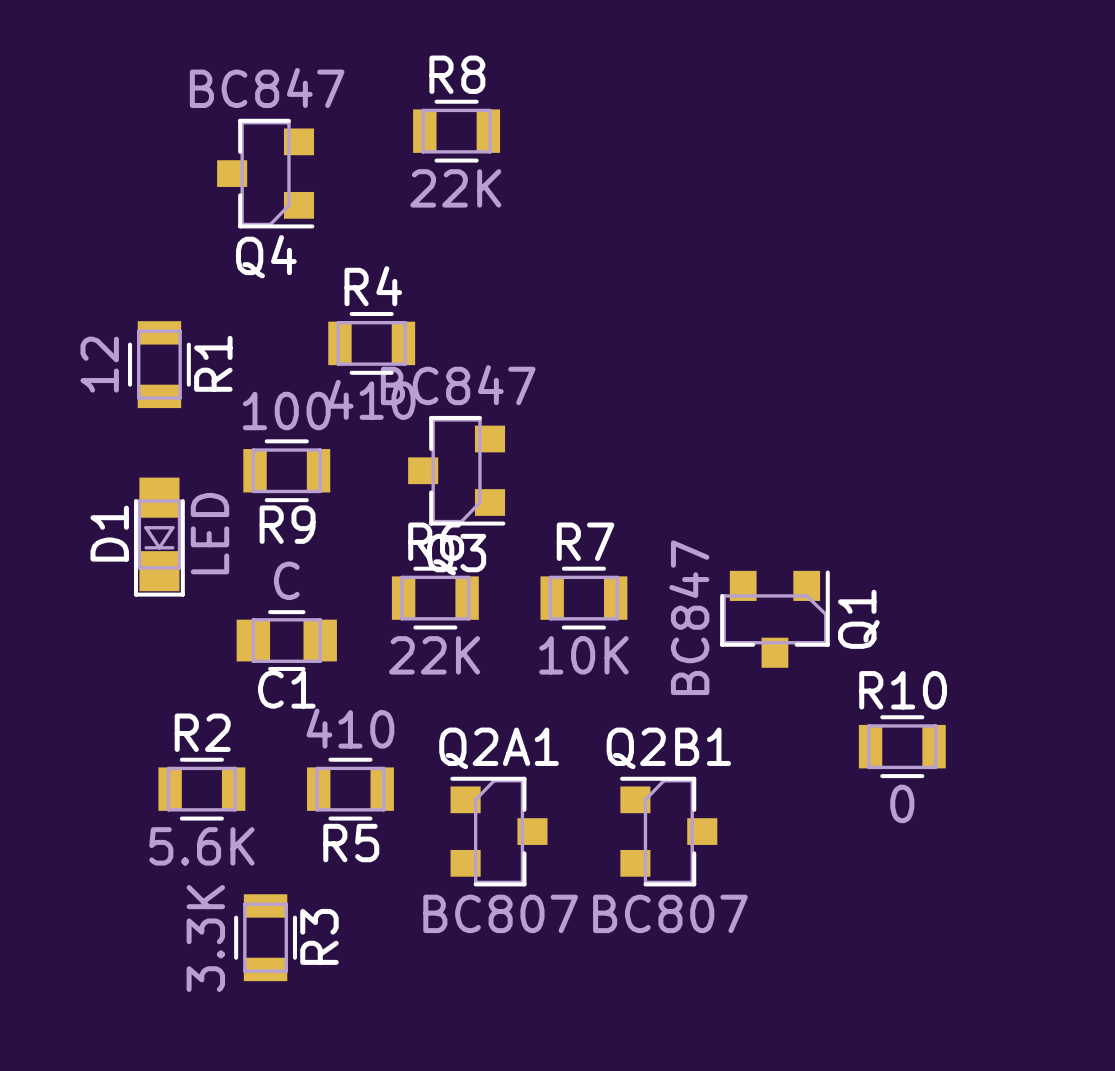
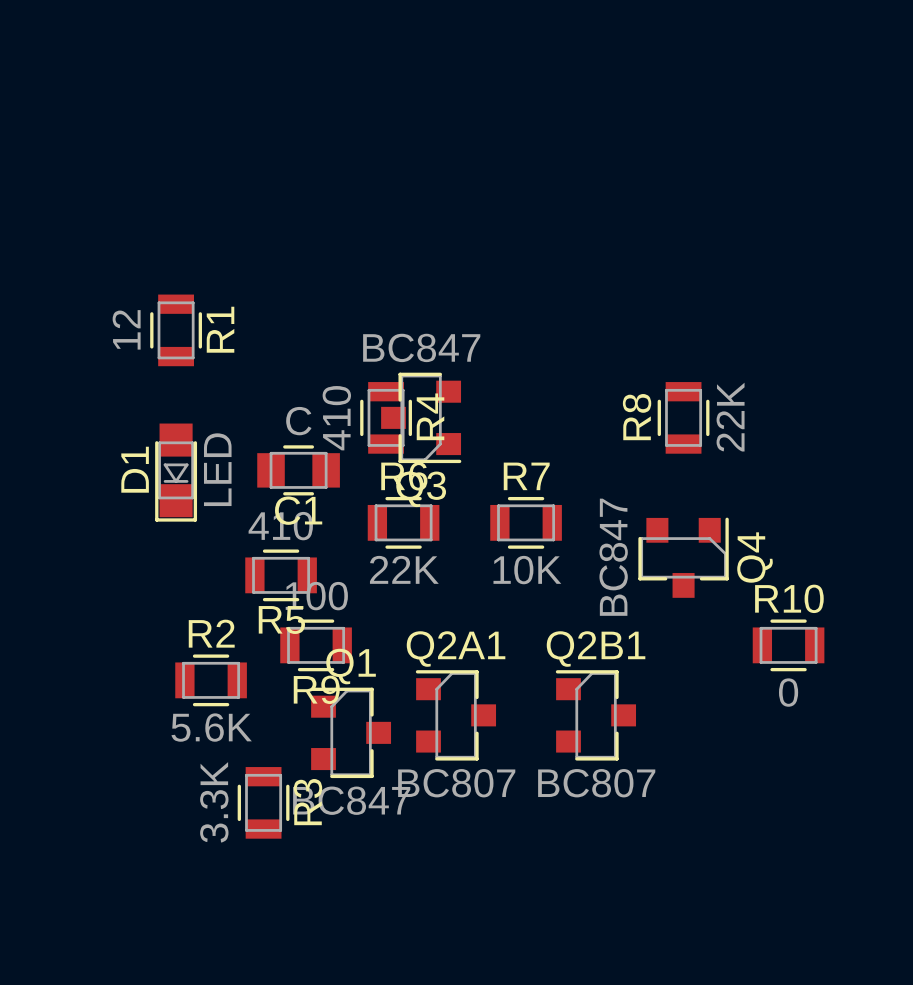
R8 name position: R8 (457, 74) -> R8 (637, 417)
R8 rotation: 0° (456, 131) -> 90° clockwise (683, 417)
R8 position: (456, 131) -> (683, 417)
Q4 rotation: 0° (265, 173) -> 90° counterclockwise (683, 557)
Q4 position: (265, 173) -> (683, 557)
R8 value position: 22K (455, 188) -> 22K (730, 417)
R4 rotation: 0° (371, 343) -> 90° clockwise (386, 417)
R4 position: (371, 343) -> (386, 417)
R9 position: (286, 470) -> (316, 645)
Q1 rotation: 0° (774, 619) -> 90° counterclockwise (350, 732)
Q1 position: (774, 619) -> (350, 732)
C1 position: (286, 640) -> (298, 470)
R5 position: (350, 789) -> (281, 575)

